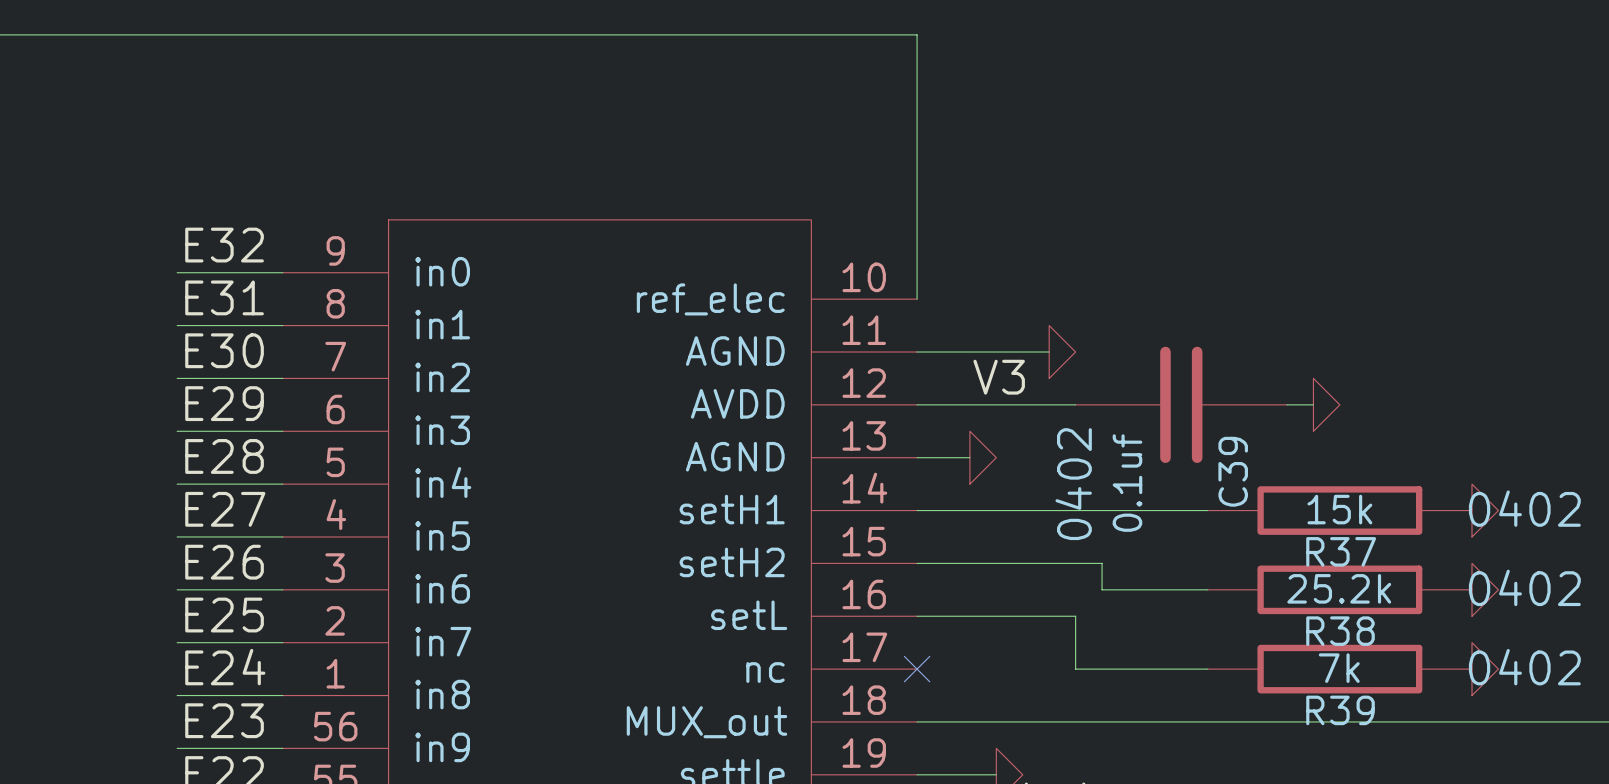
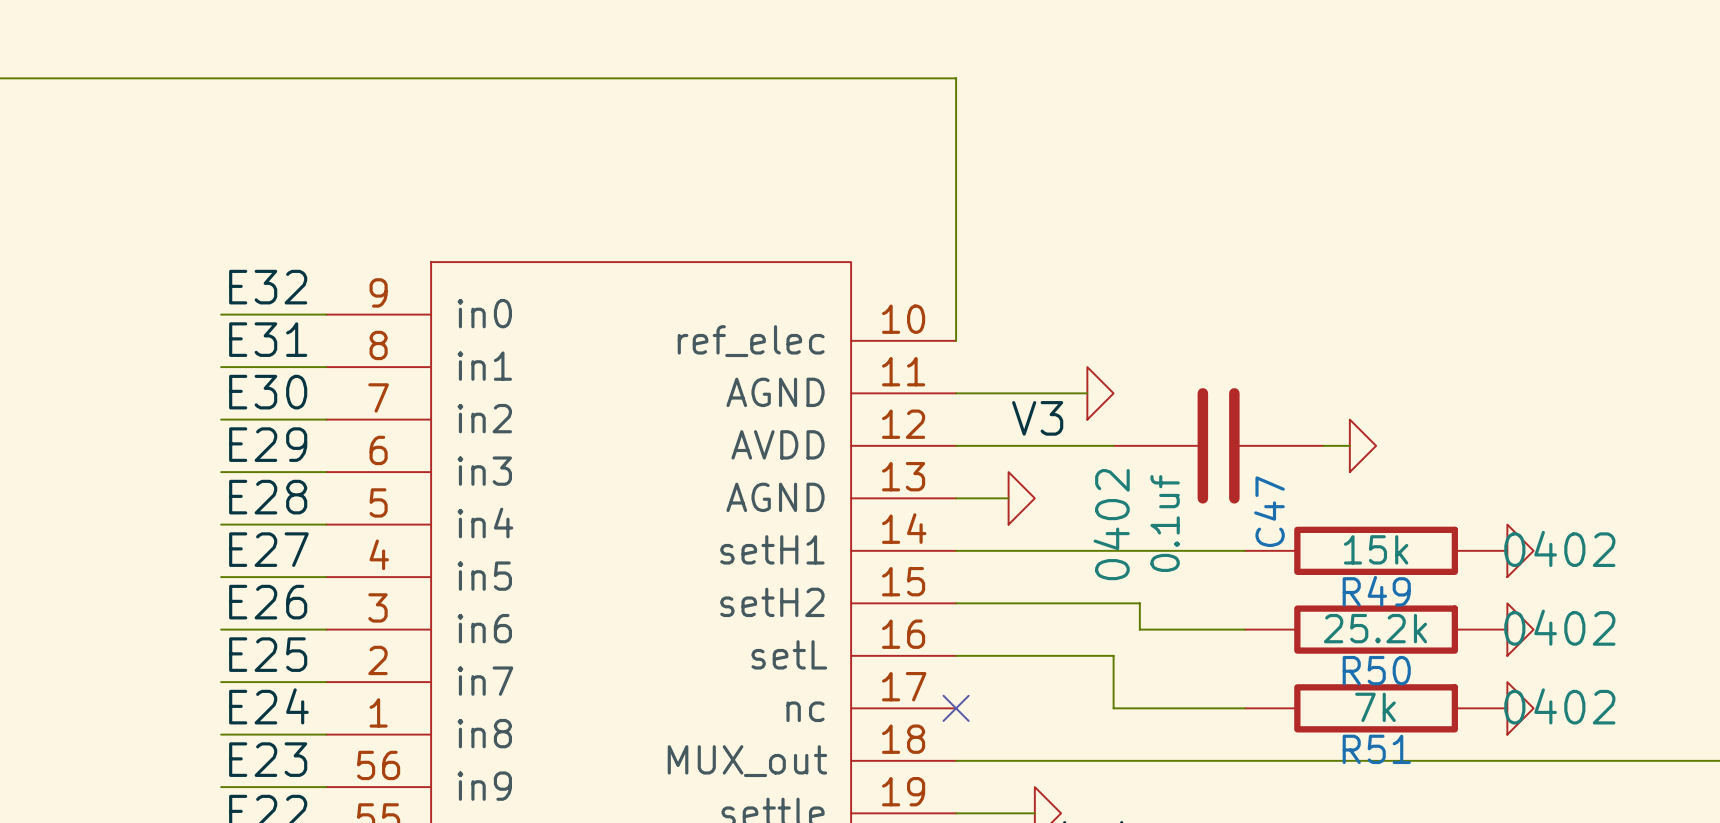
C39 name: C39 (1233, 471) -> C47 (1269, 511)
R37 name: R37 (1341, 551) -> R49 (1376, 591)
R38 name: R38 (1340, 631) -> R50 (1376, 670)
R39 name: R39 (1340, 710) -> R51 (1376, 749)

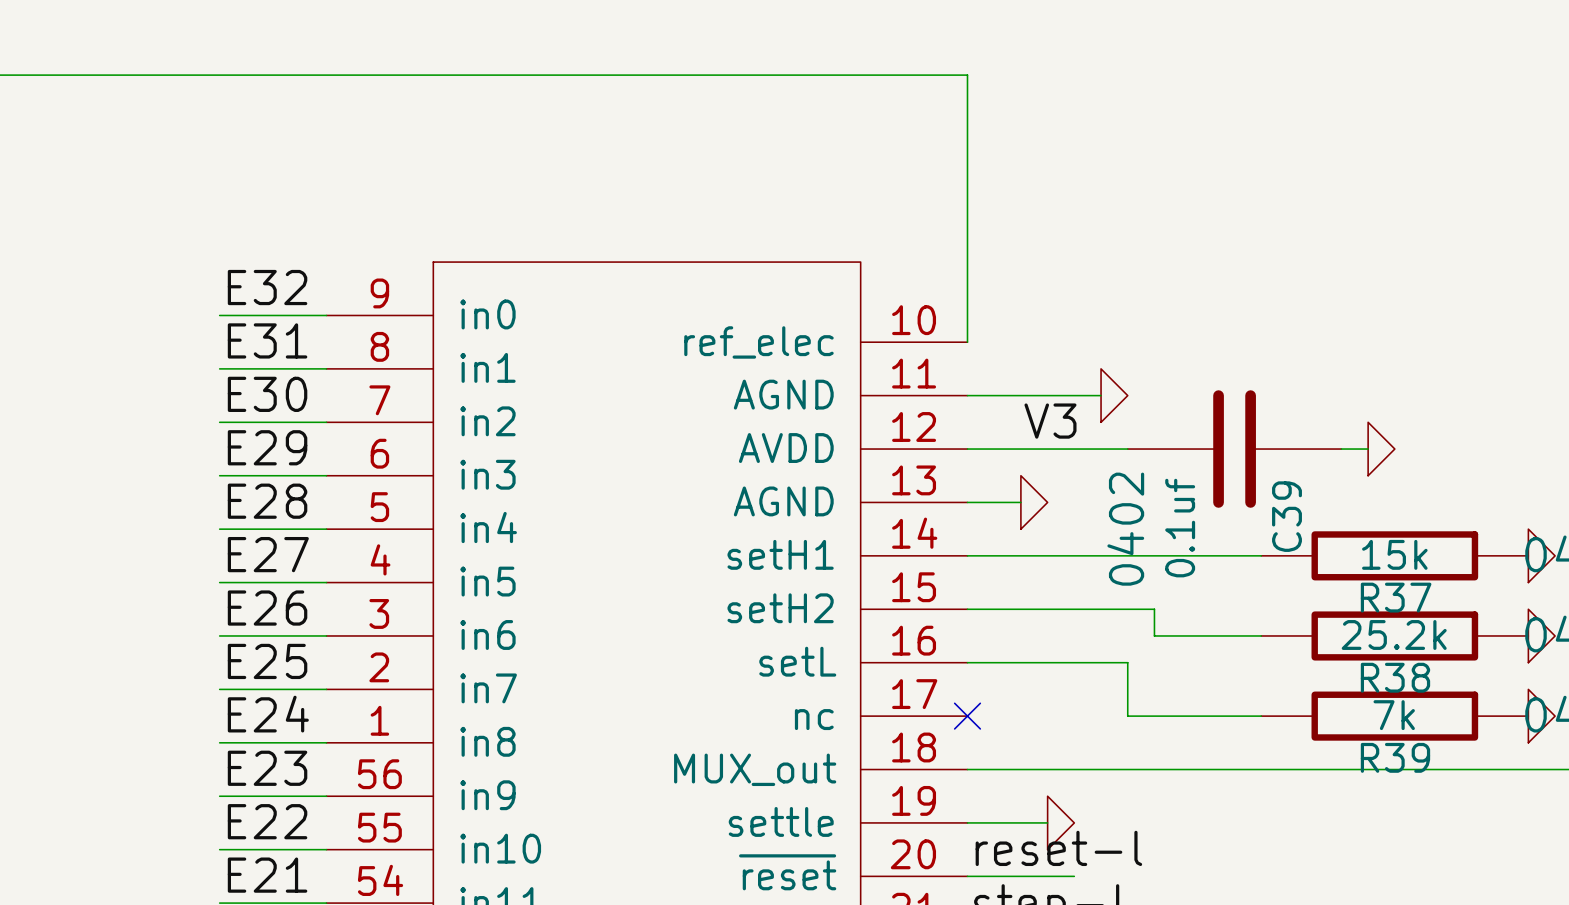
C47 name: C47 (1269, 511) -> C39 (1287, 516)
R49 name: R49 (1376, 591) -> R37 (1396, 597)
R50 name: R50 (1376, 670) -> R38 (1395, 677)
R51 name: R51 (1376, 749) -> R39 (1395, 757)

